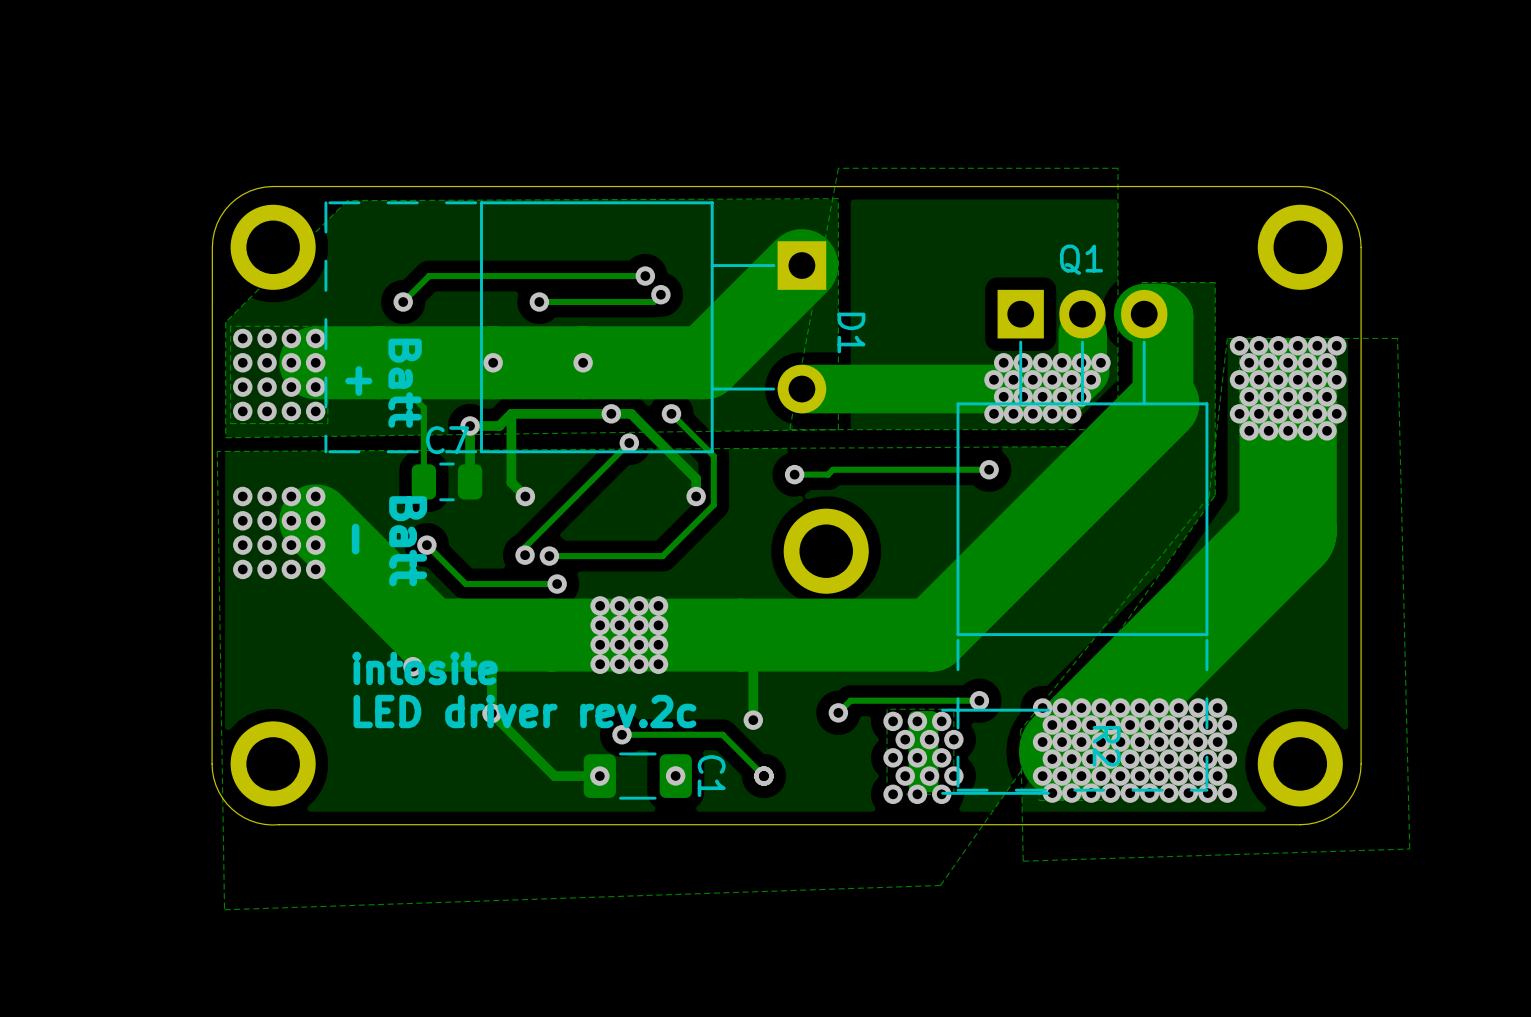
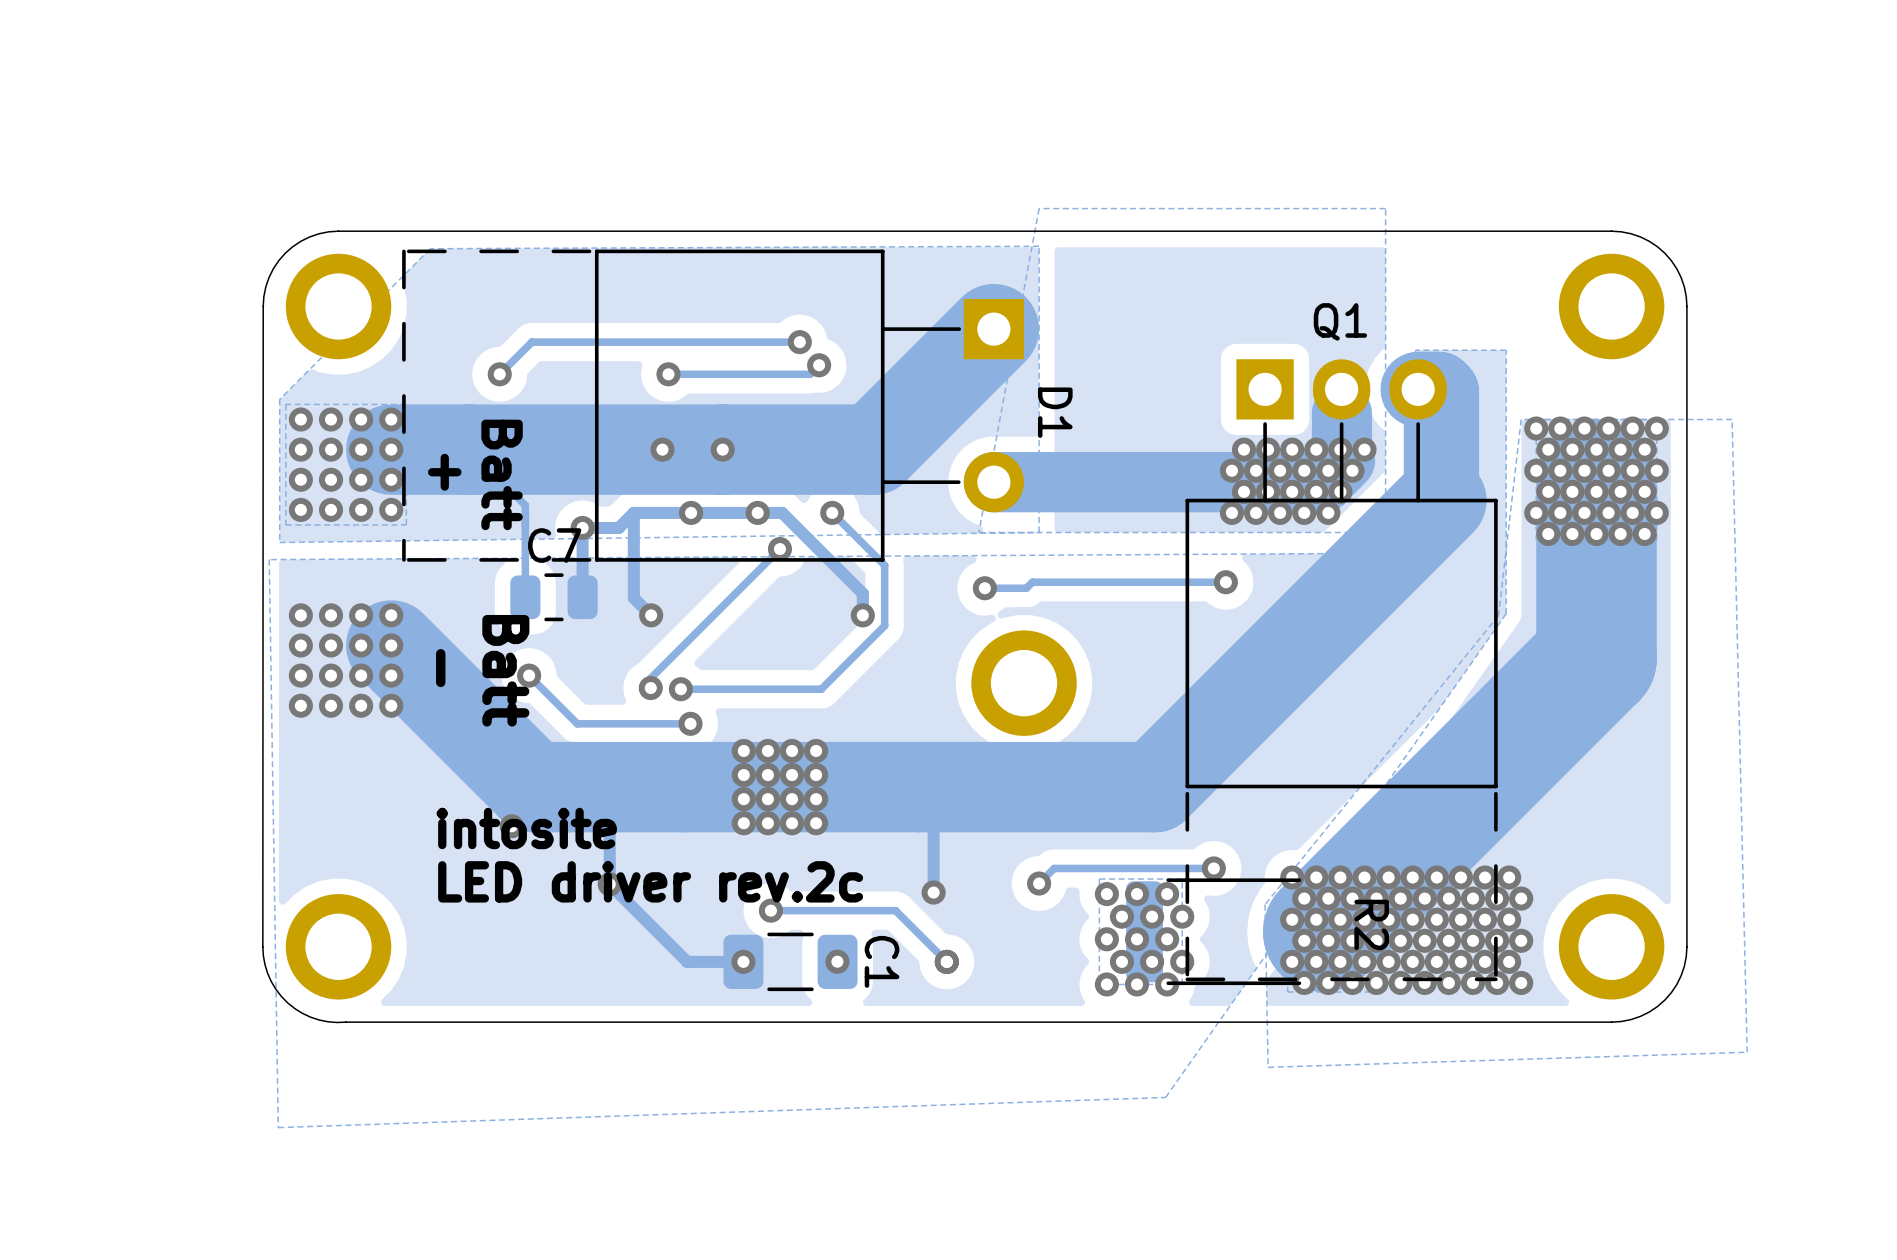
via: (493, 362) -> none
via: none -> (662, 449)
via: none -> (691, 512)

